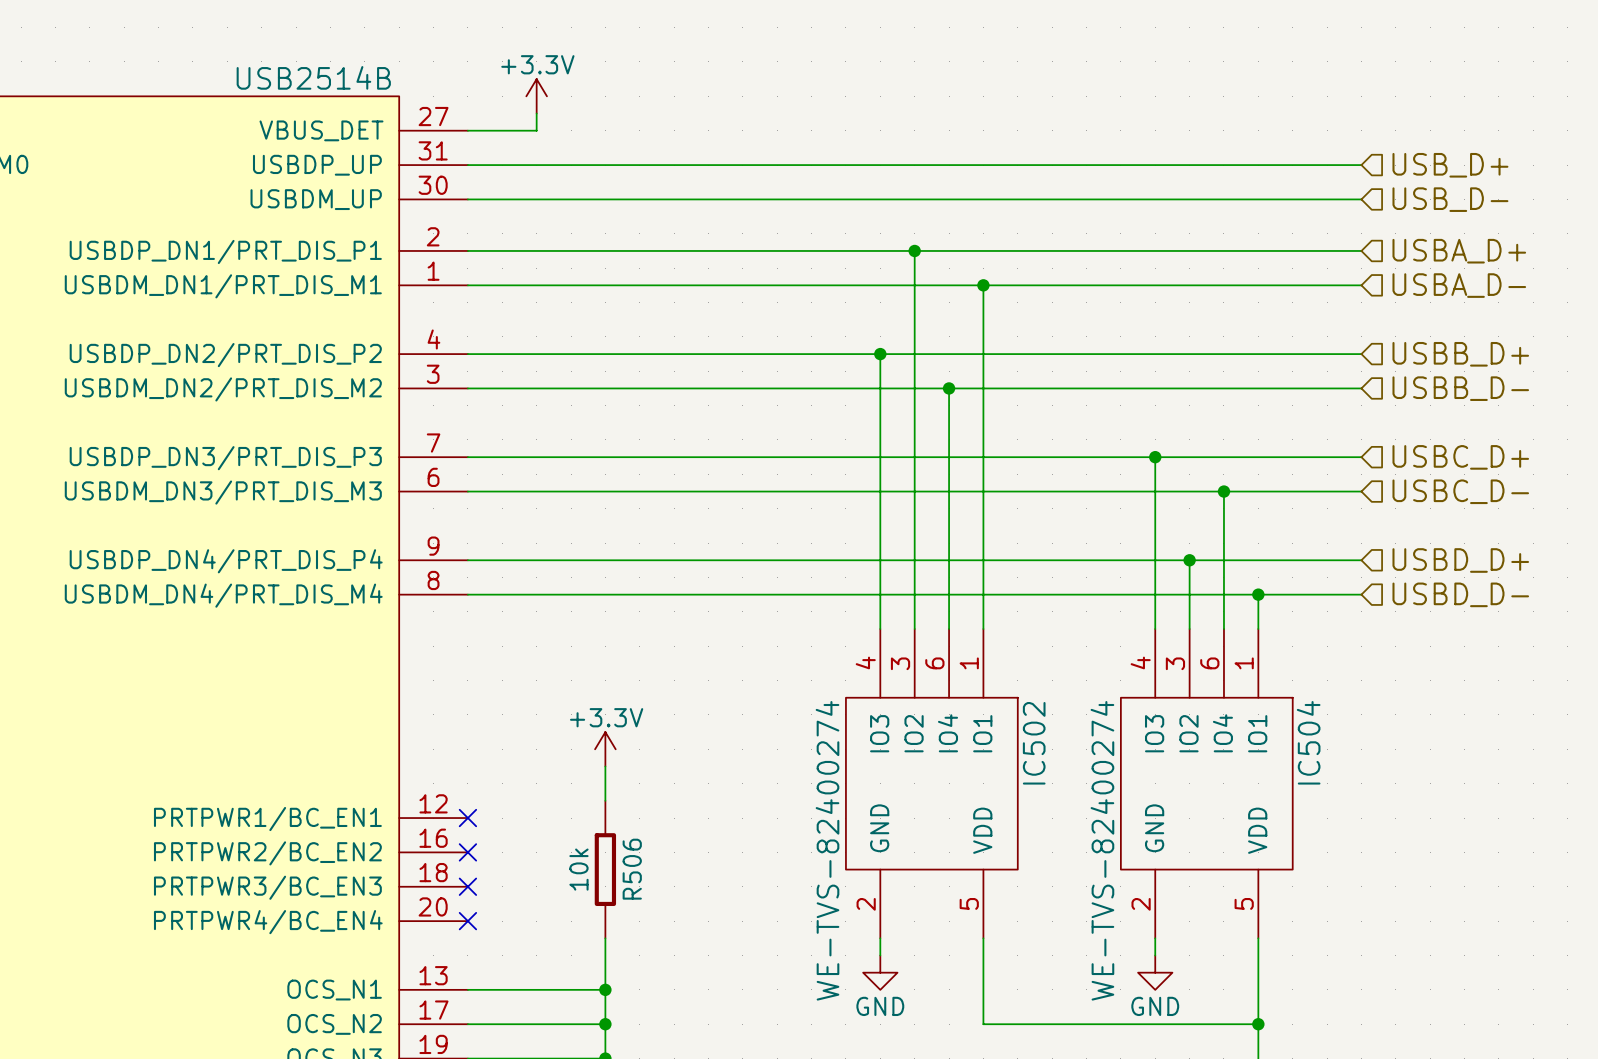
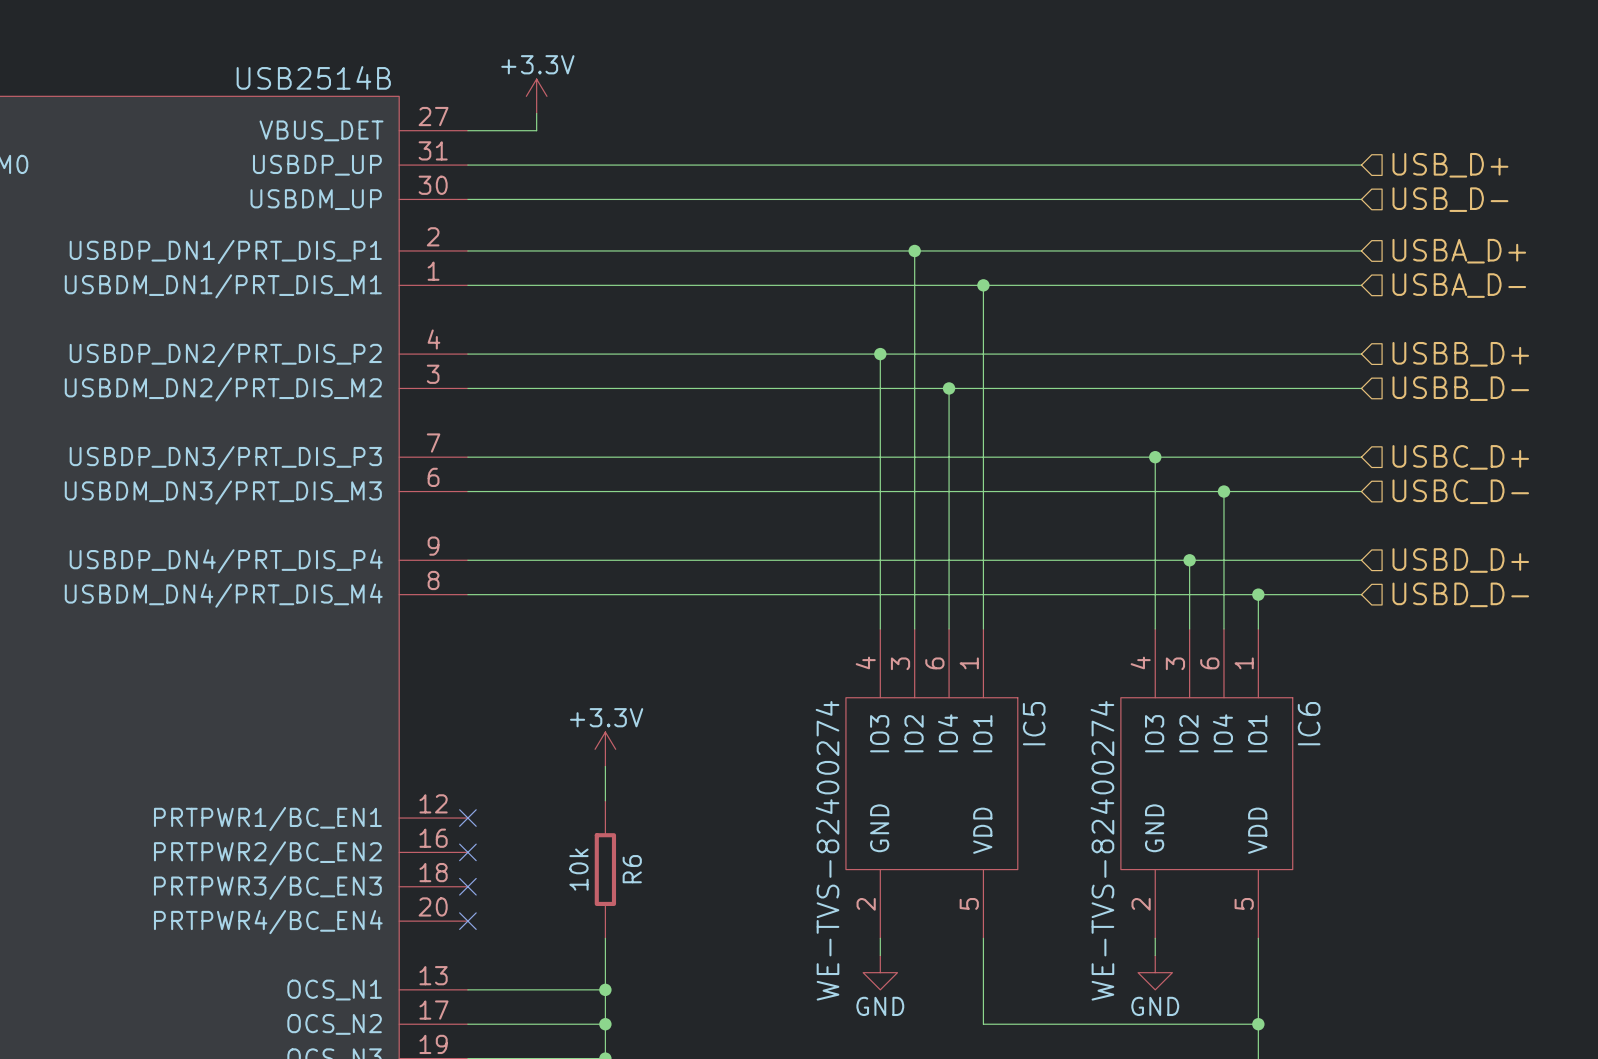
IC504 name: IC504 (1308, 742) -> IC6 (1309, 723)
IC502 name: IC502 (1034, 743) -> IC5 (1034, 723)
R506 name: R506 (632, 869) -> R6 (632, 869)

